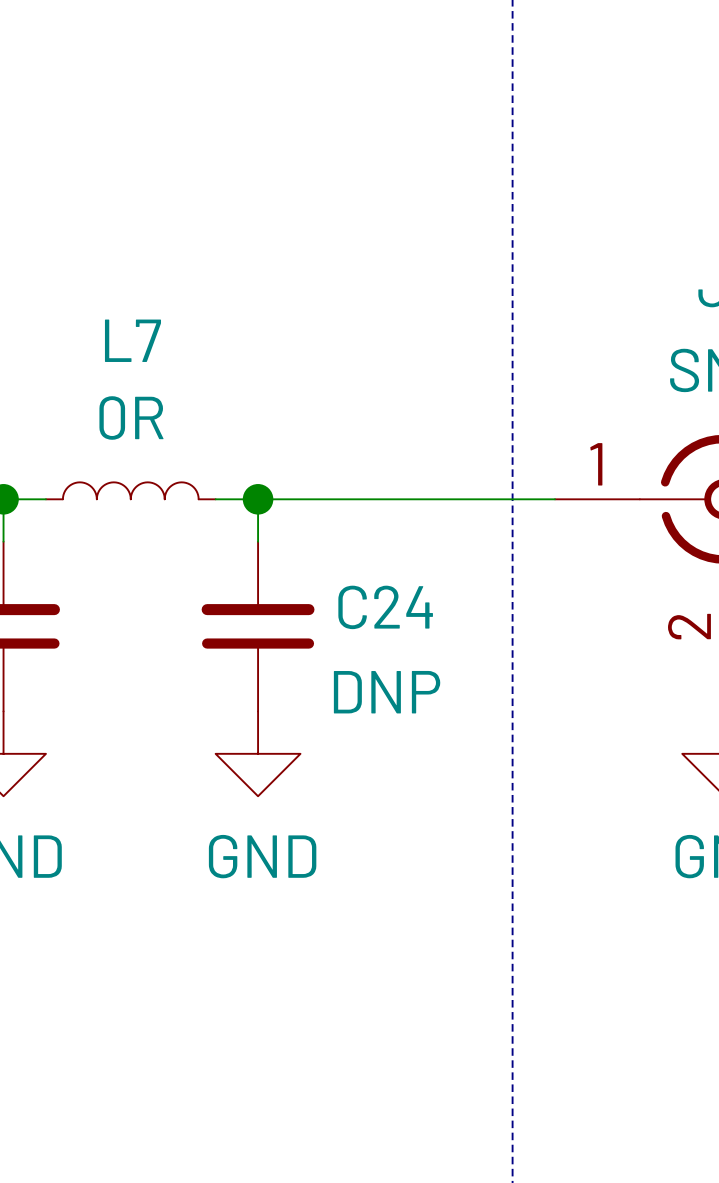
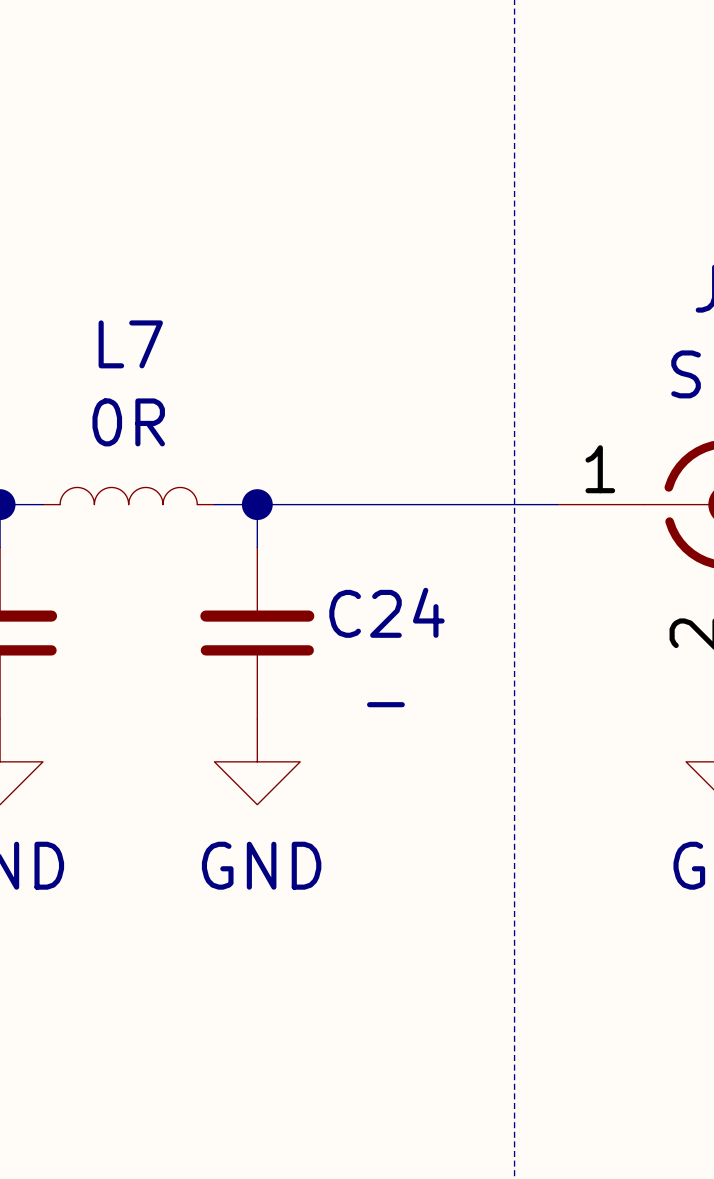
C24 value: DNP (387, 692) -> - (385, 704)

